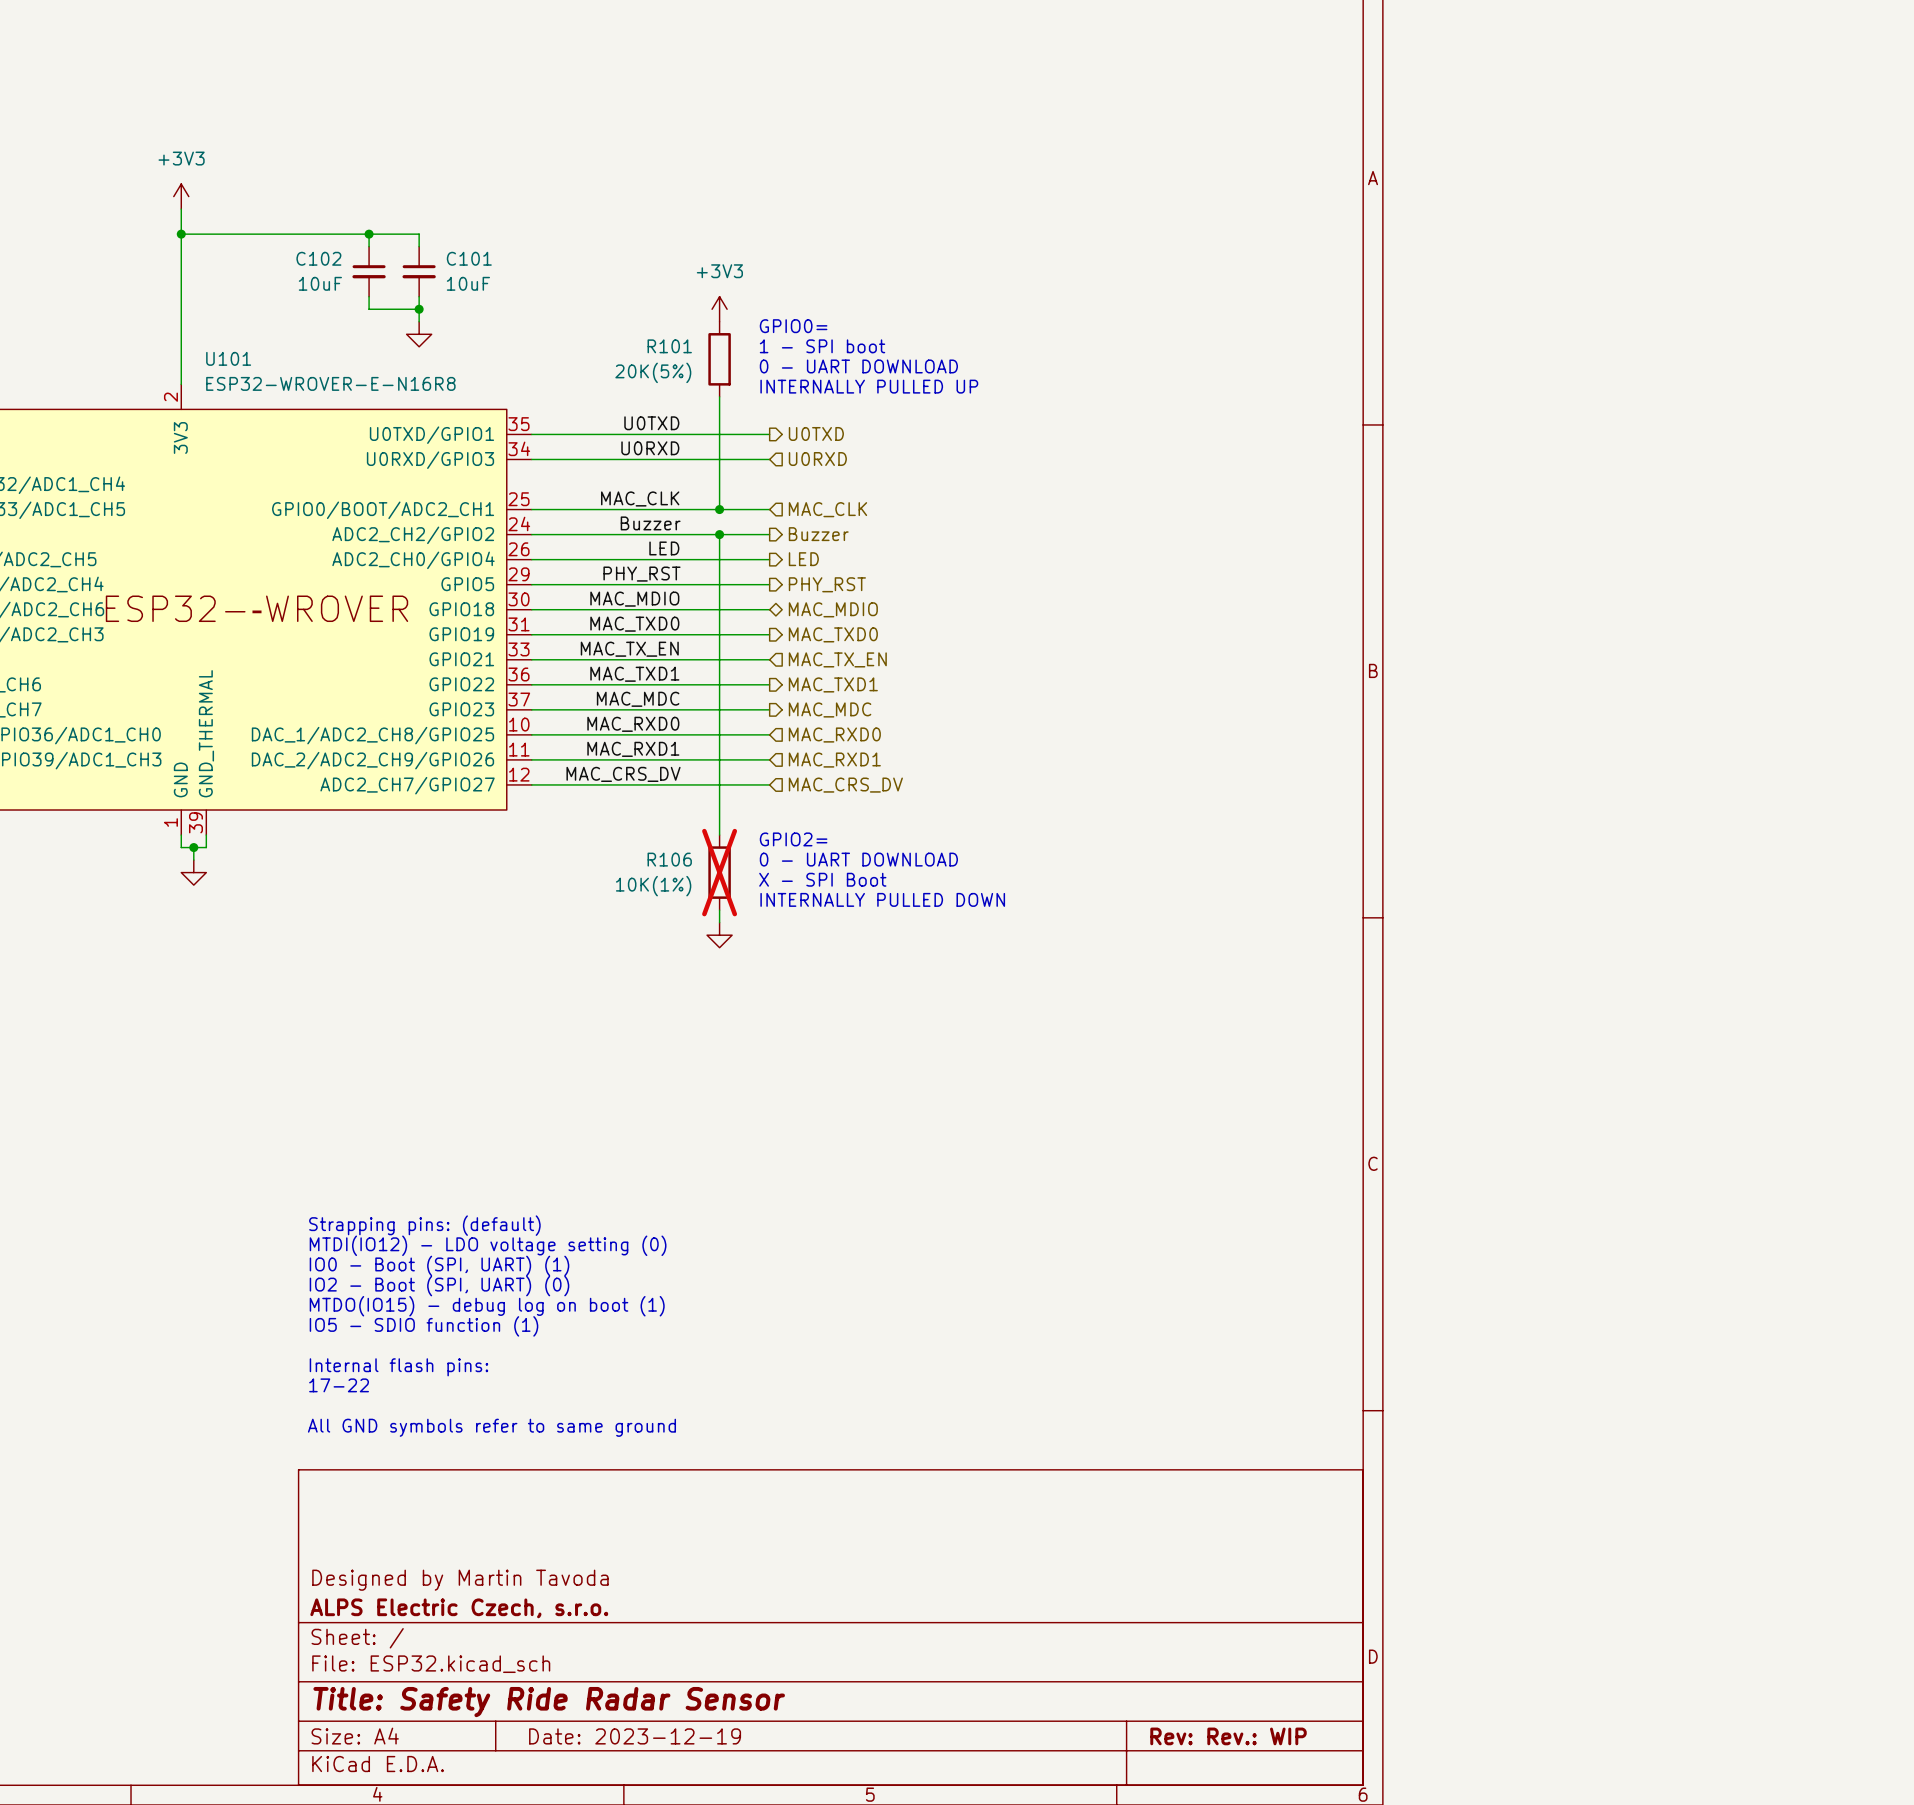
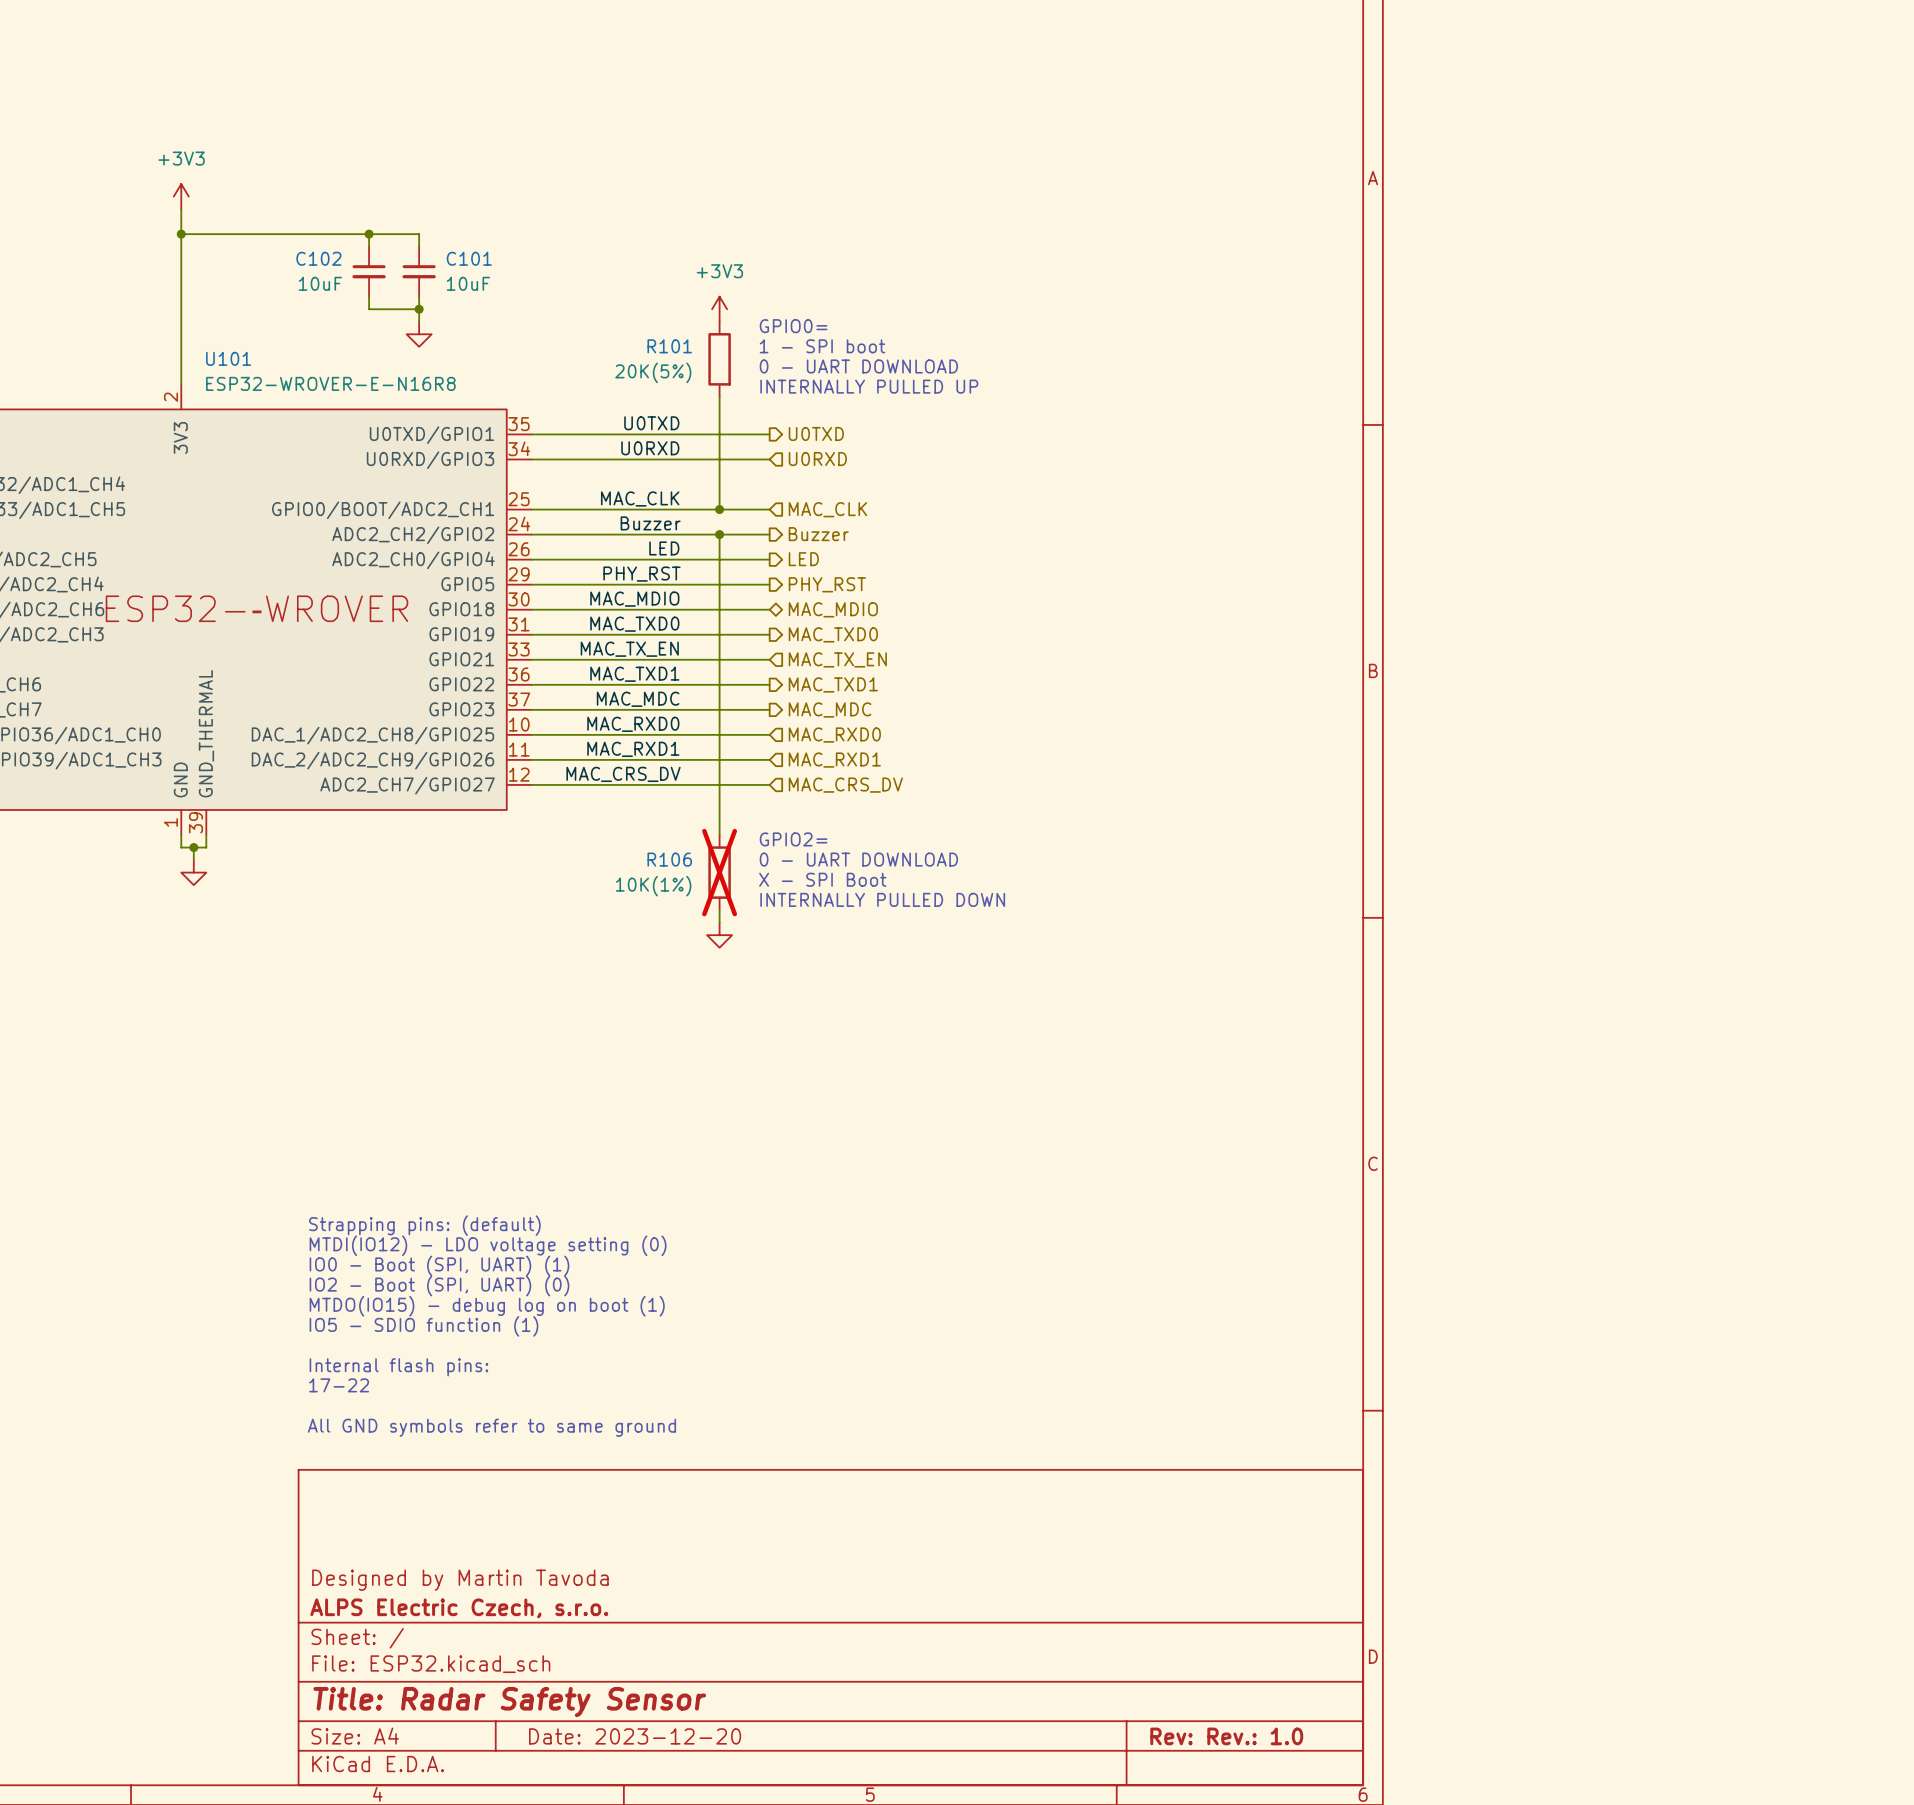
title block: Title: Safety Ride Radar Sensor (549, 1702) -> Title: Radar Safety Sensor (509, 1702)
title block: Date: 2023-12-19 (635, 1736) -> Date: 2023-12-20 (635, 1736)
title block: Rev: Rev.: WIP (1228, 1736) -> Rev: Rev.: 1.0 (1226, 1736)

